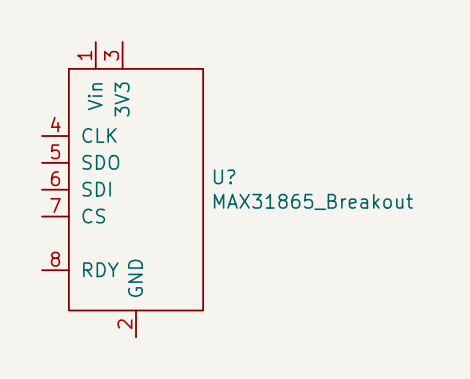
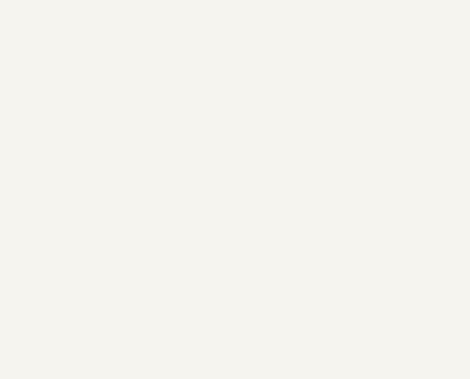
U?: MAX31865_Breakout (122, 189) -> none

